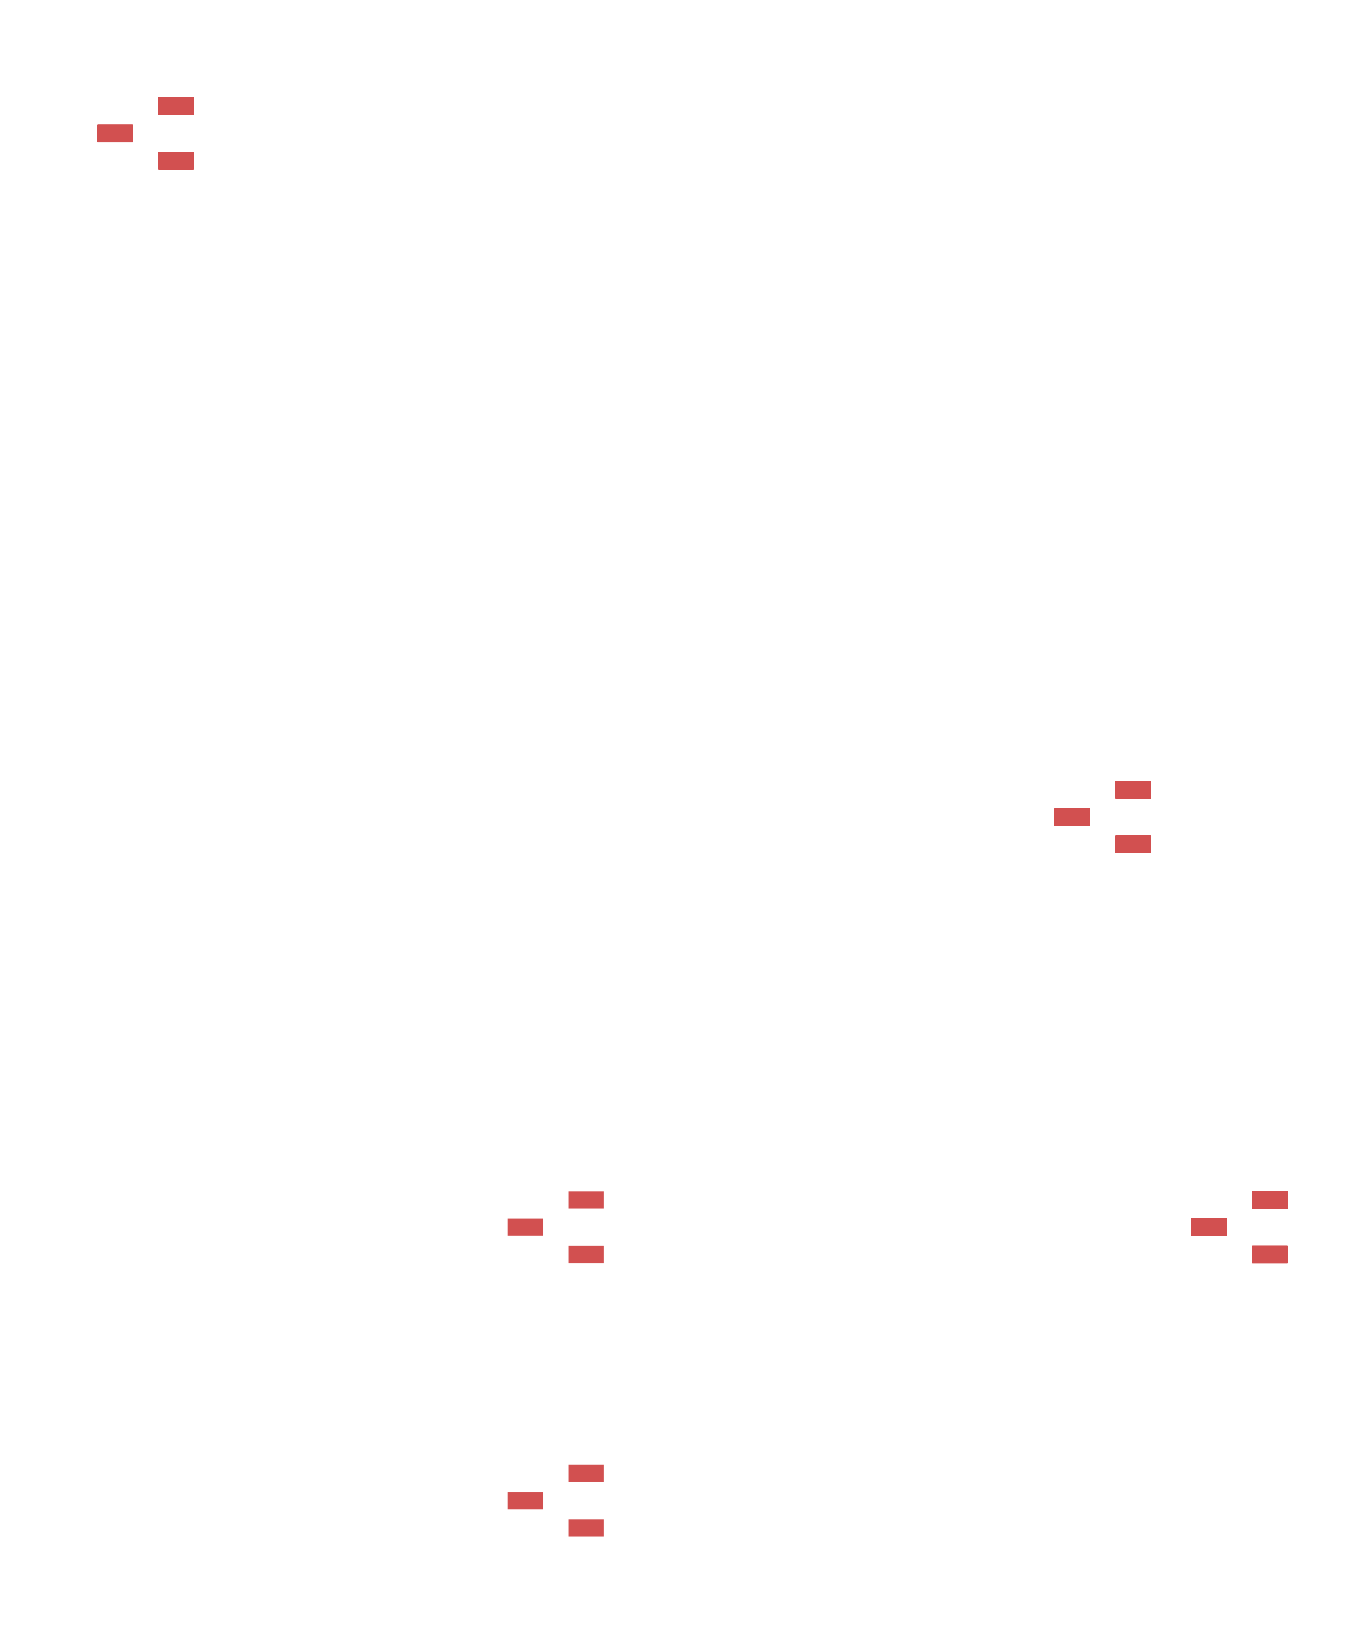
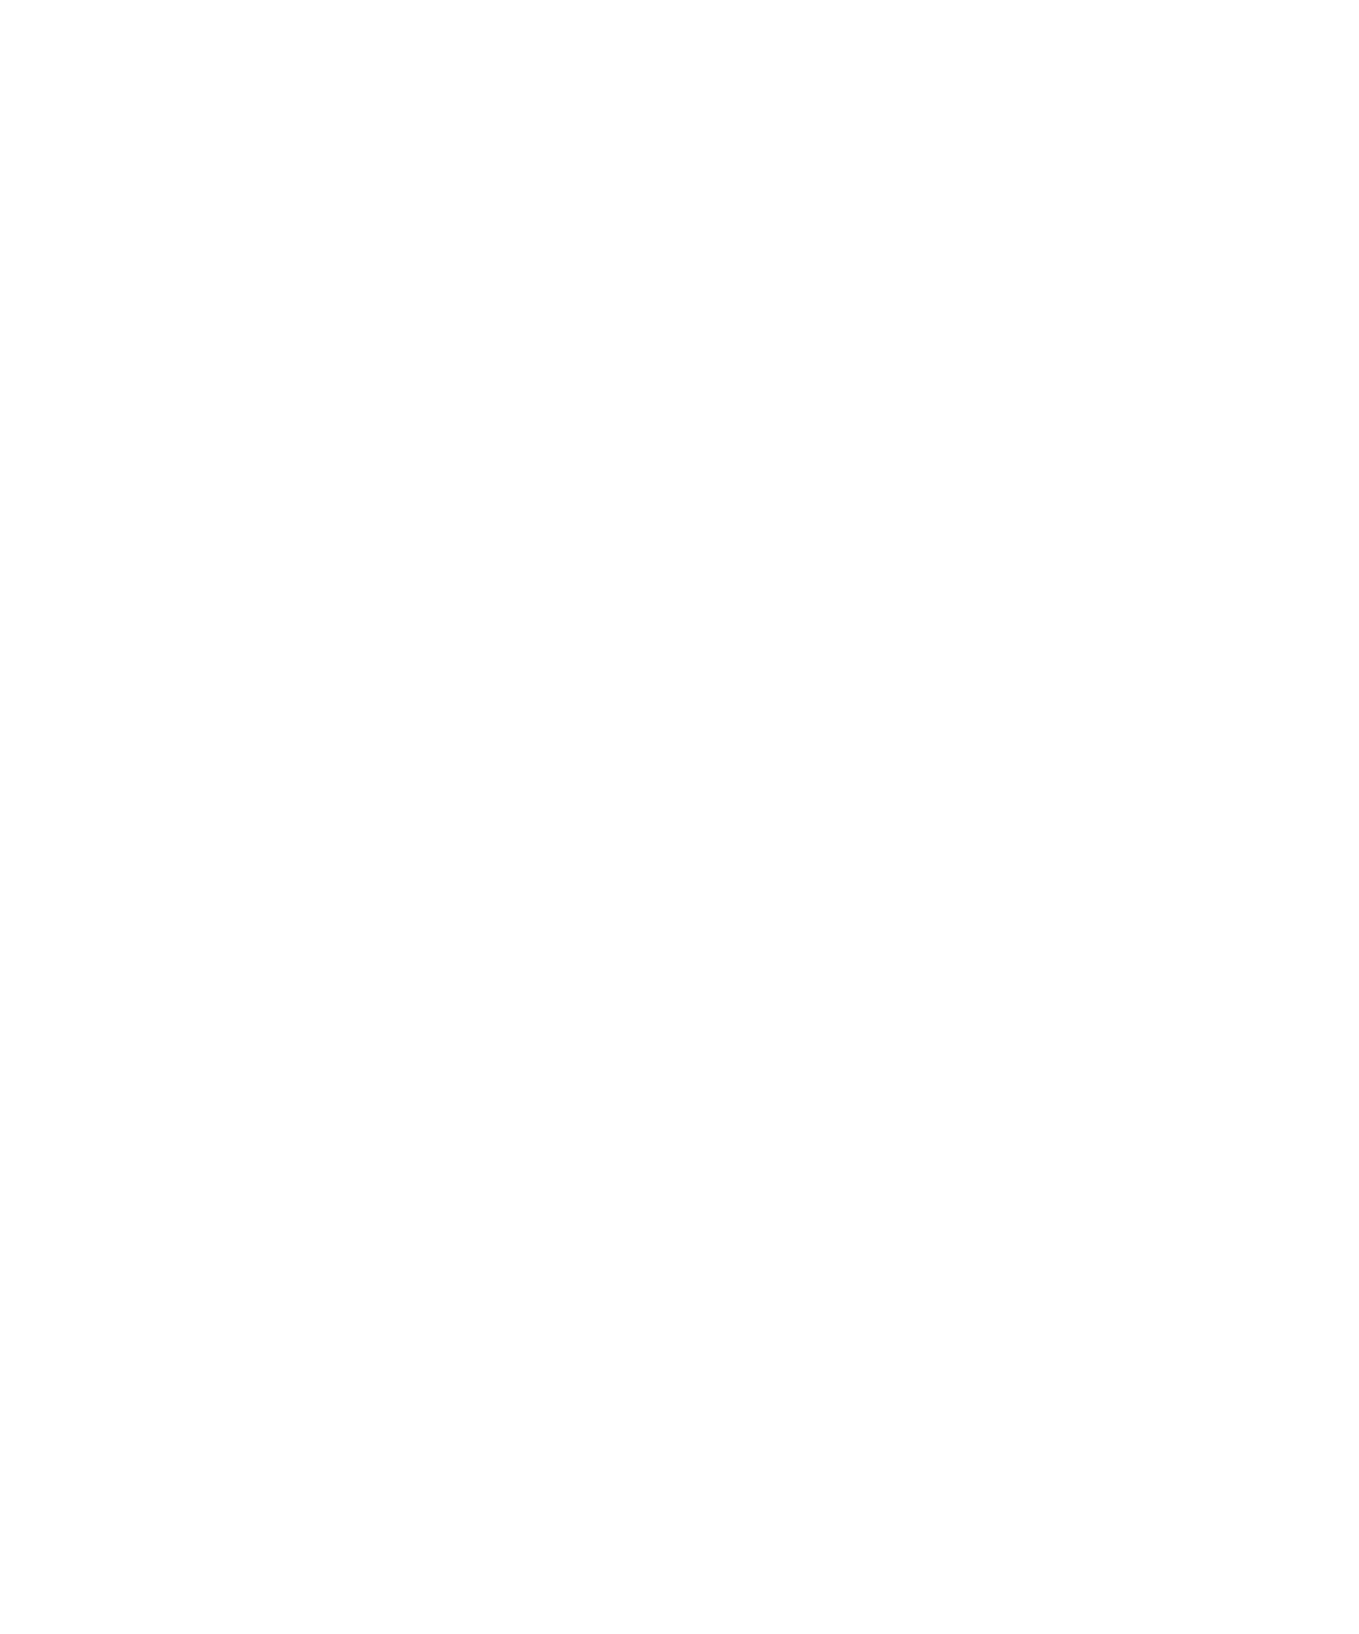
part: (145, 133) -> none
part: (1102, 817) -> none
part: (555, 1227) -> none
part: (1239, 1227) -> none
part: (555, 1500) -> none

